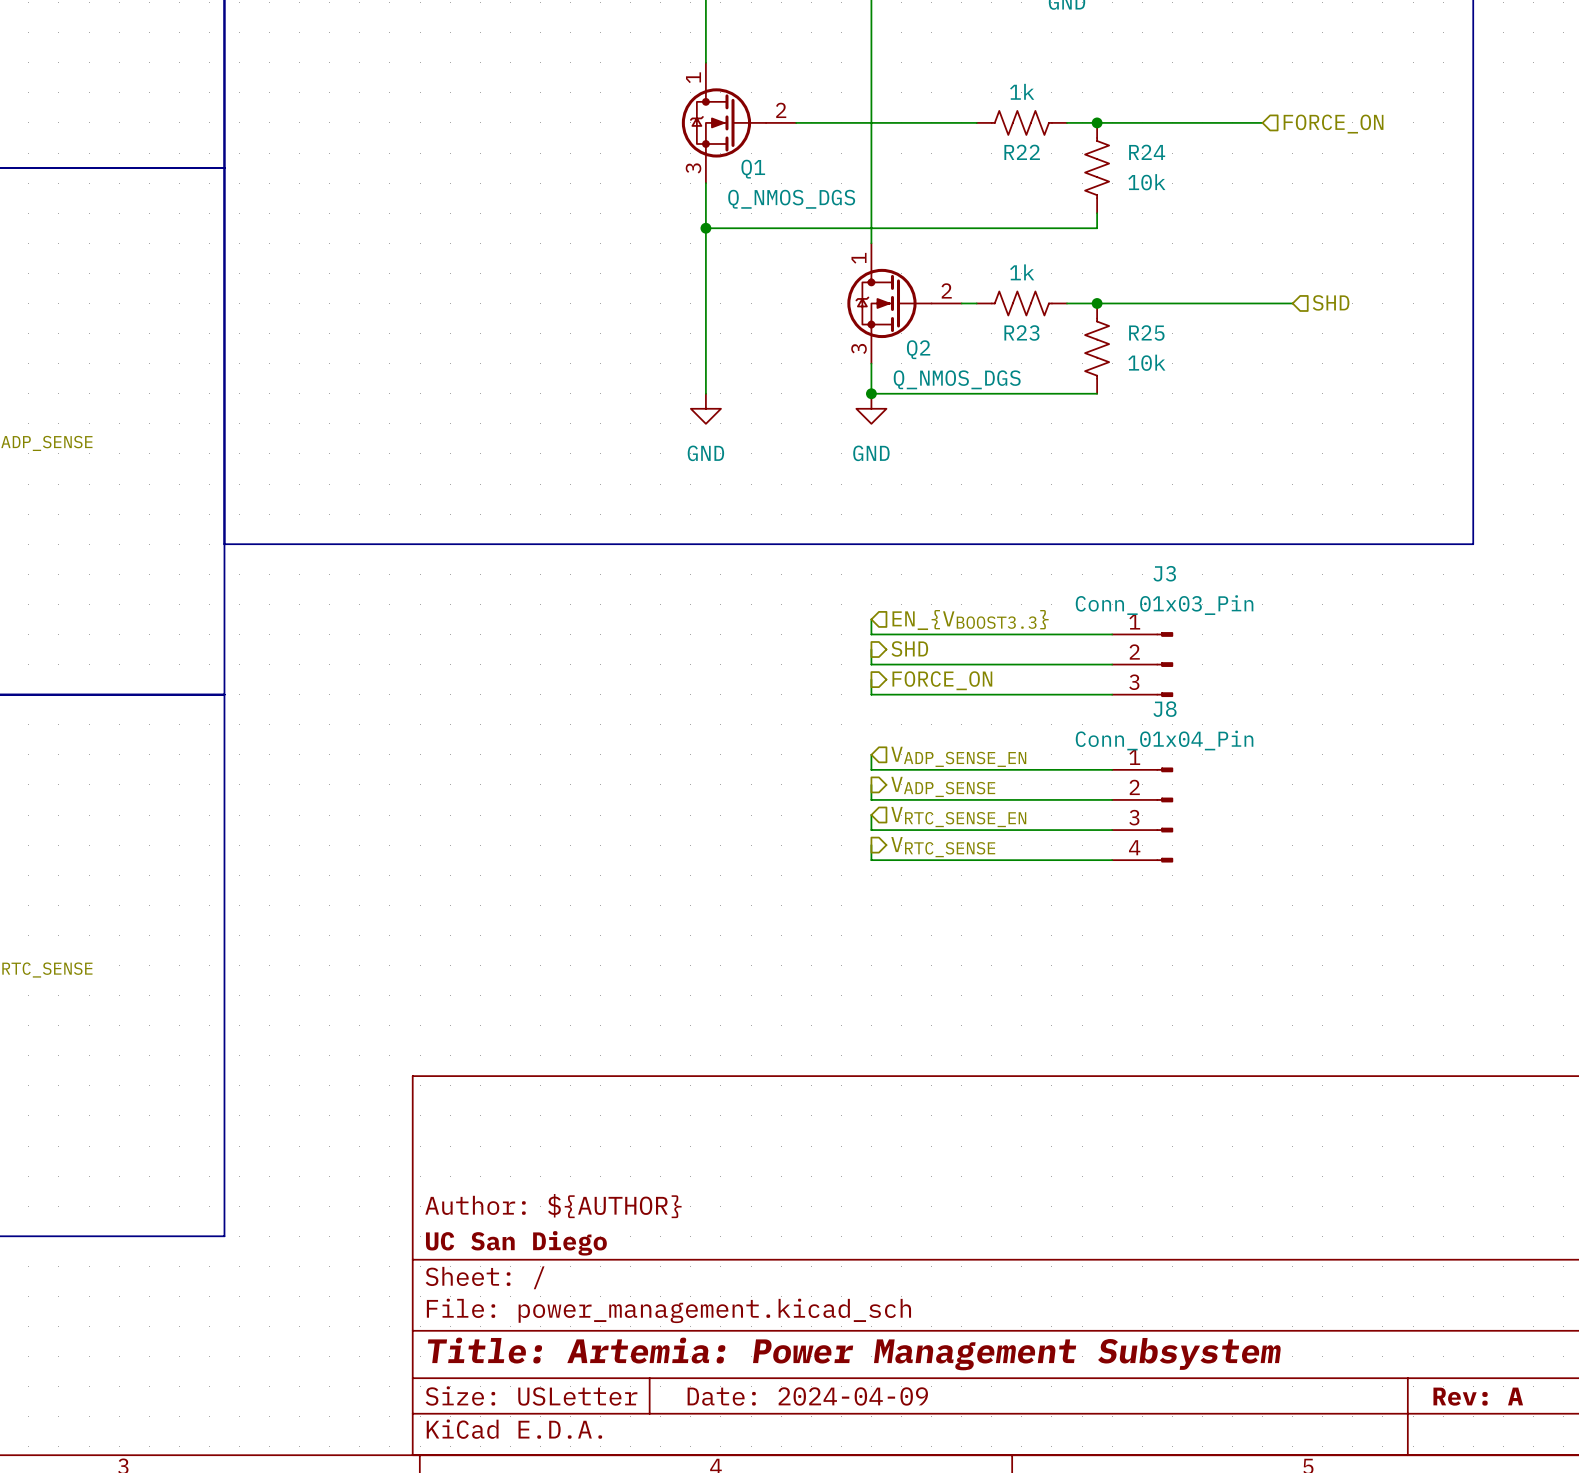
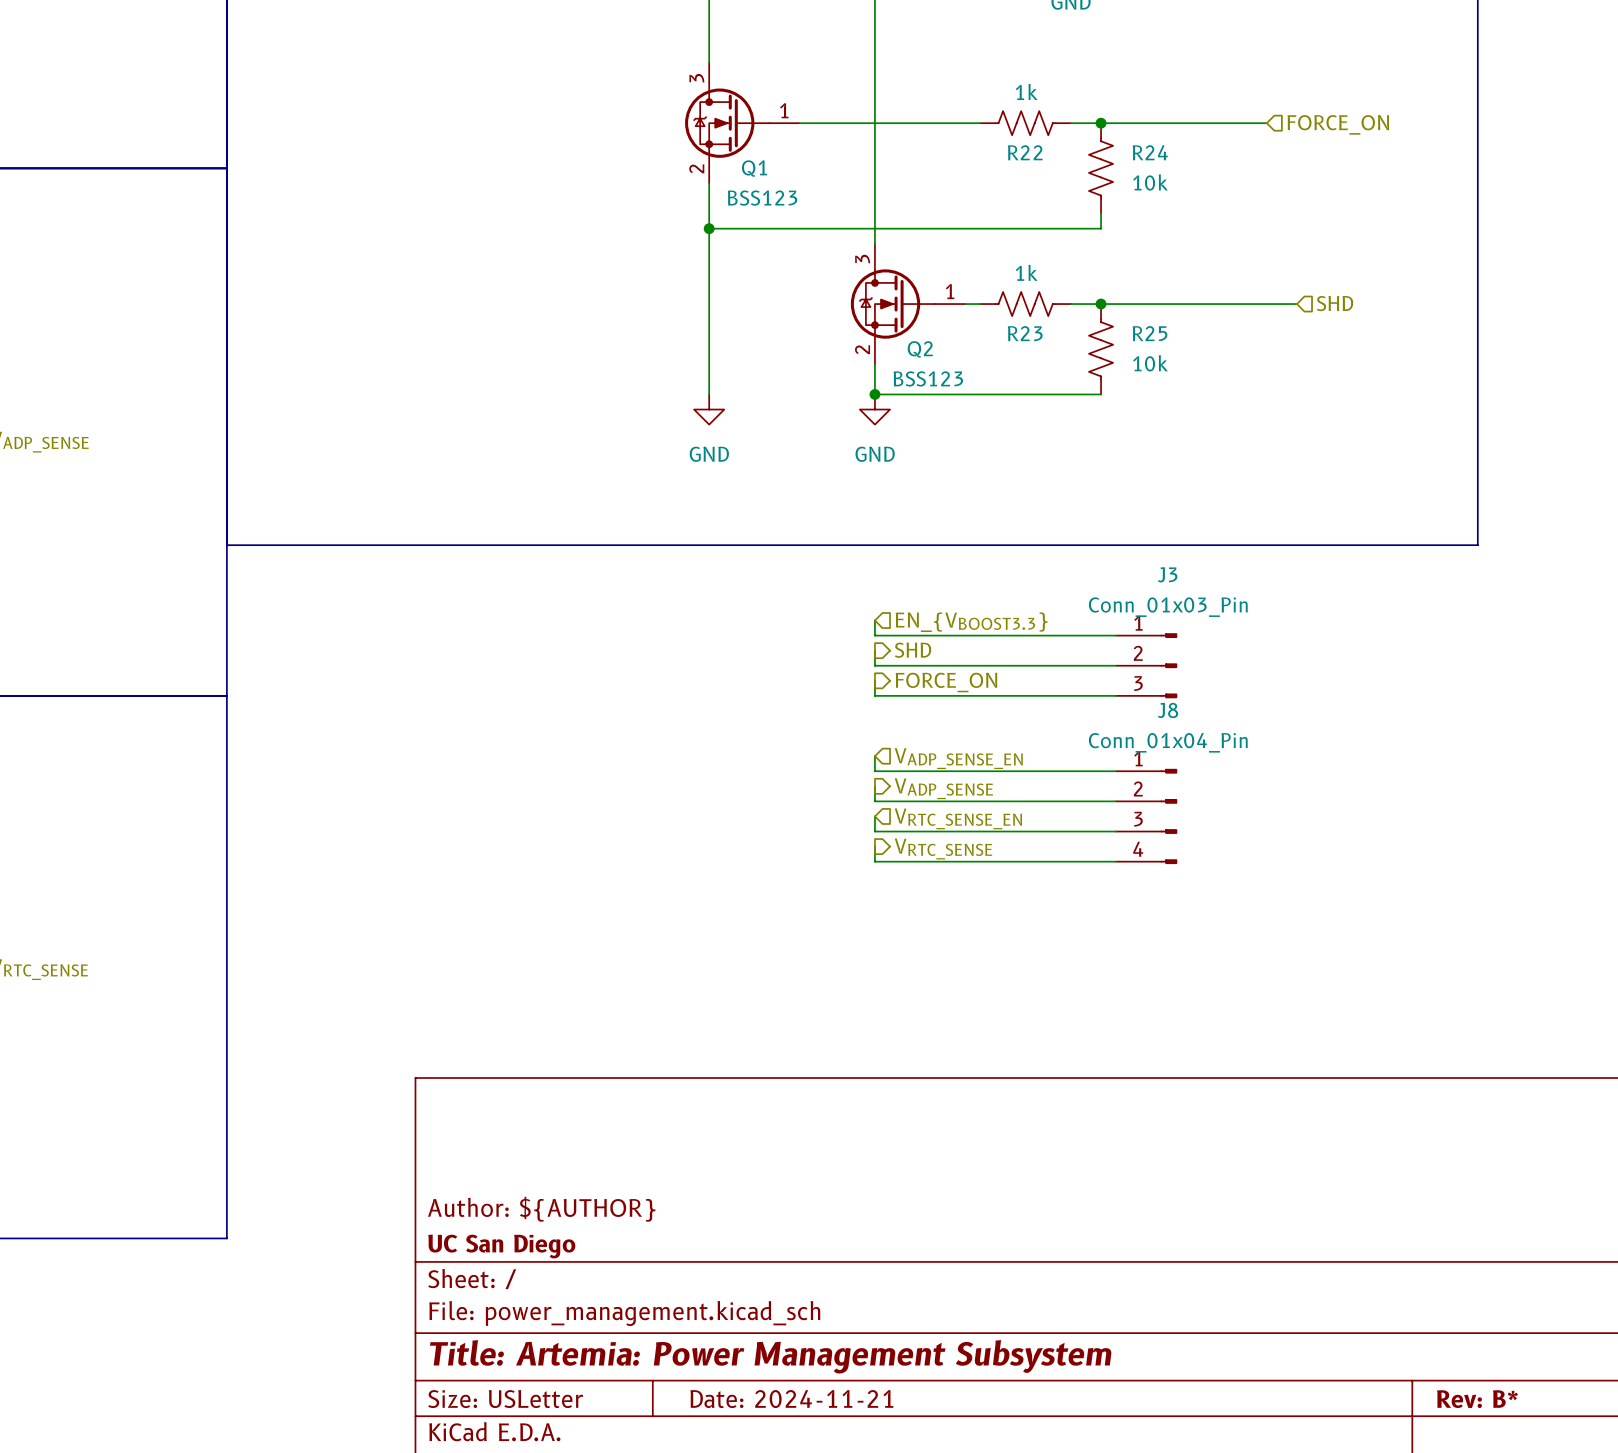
Q1 pin number: 1 (693, 77) -> 3 (696, 78)
Q1 pin number: 2 (781, 110) -> 1 (784, 110)
Q1 pin number: 3 (693, 168) -> 2 (696, 168)
Q1 value: Q_NMOS_DGS (791, 199) -> BSS123 (762, 198)
Q2 pin number: 1 (859, 258) -> 3 (862, 259)
Q2 pin number: 2 (946, 290) -> 1 (950, 291)
Q2 pin number: 3 (859, 348) -> 2 (862, 349)
Q2 value: Q_NMOS_DGS (957, 379) -> BSS123 (928, 378)
title block: Date: 2024-04-09 (807, 1396) -> Date: 2024-11-21 (791, 1399)
title block: Rev: A (1478, 1396) -> Rev: B* (1477, 1399)

